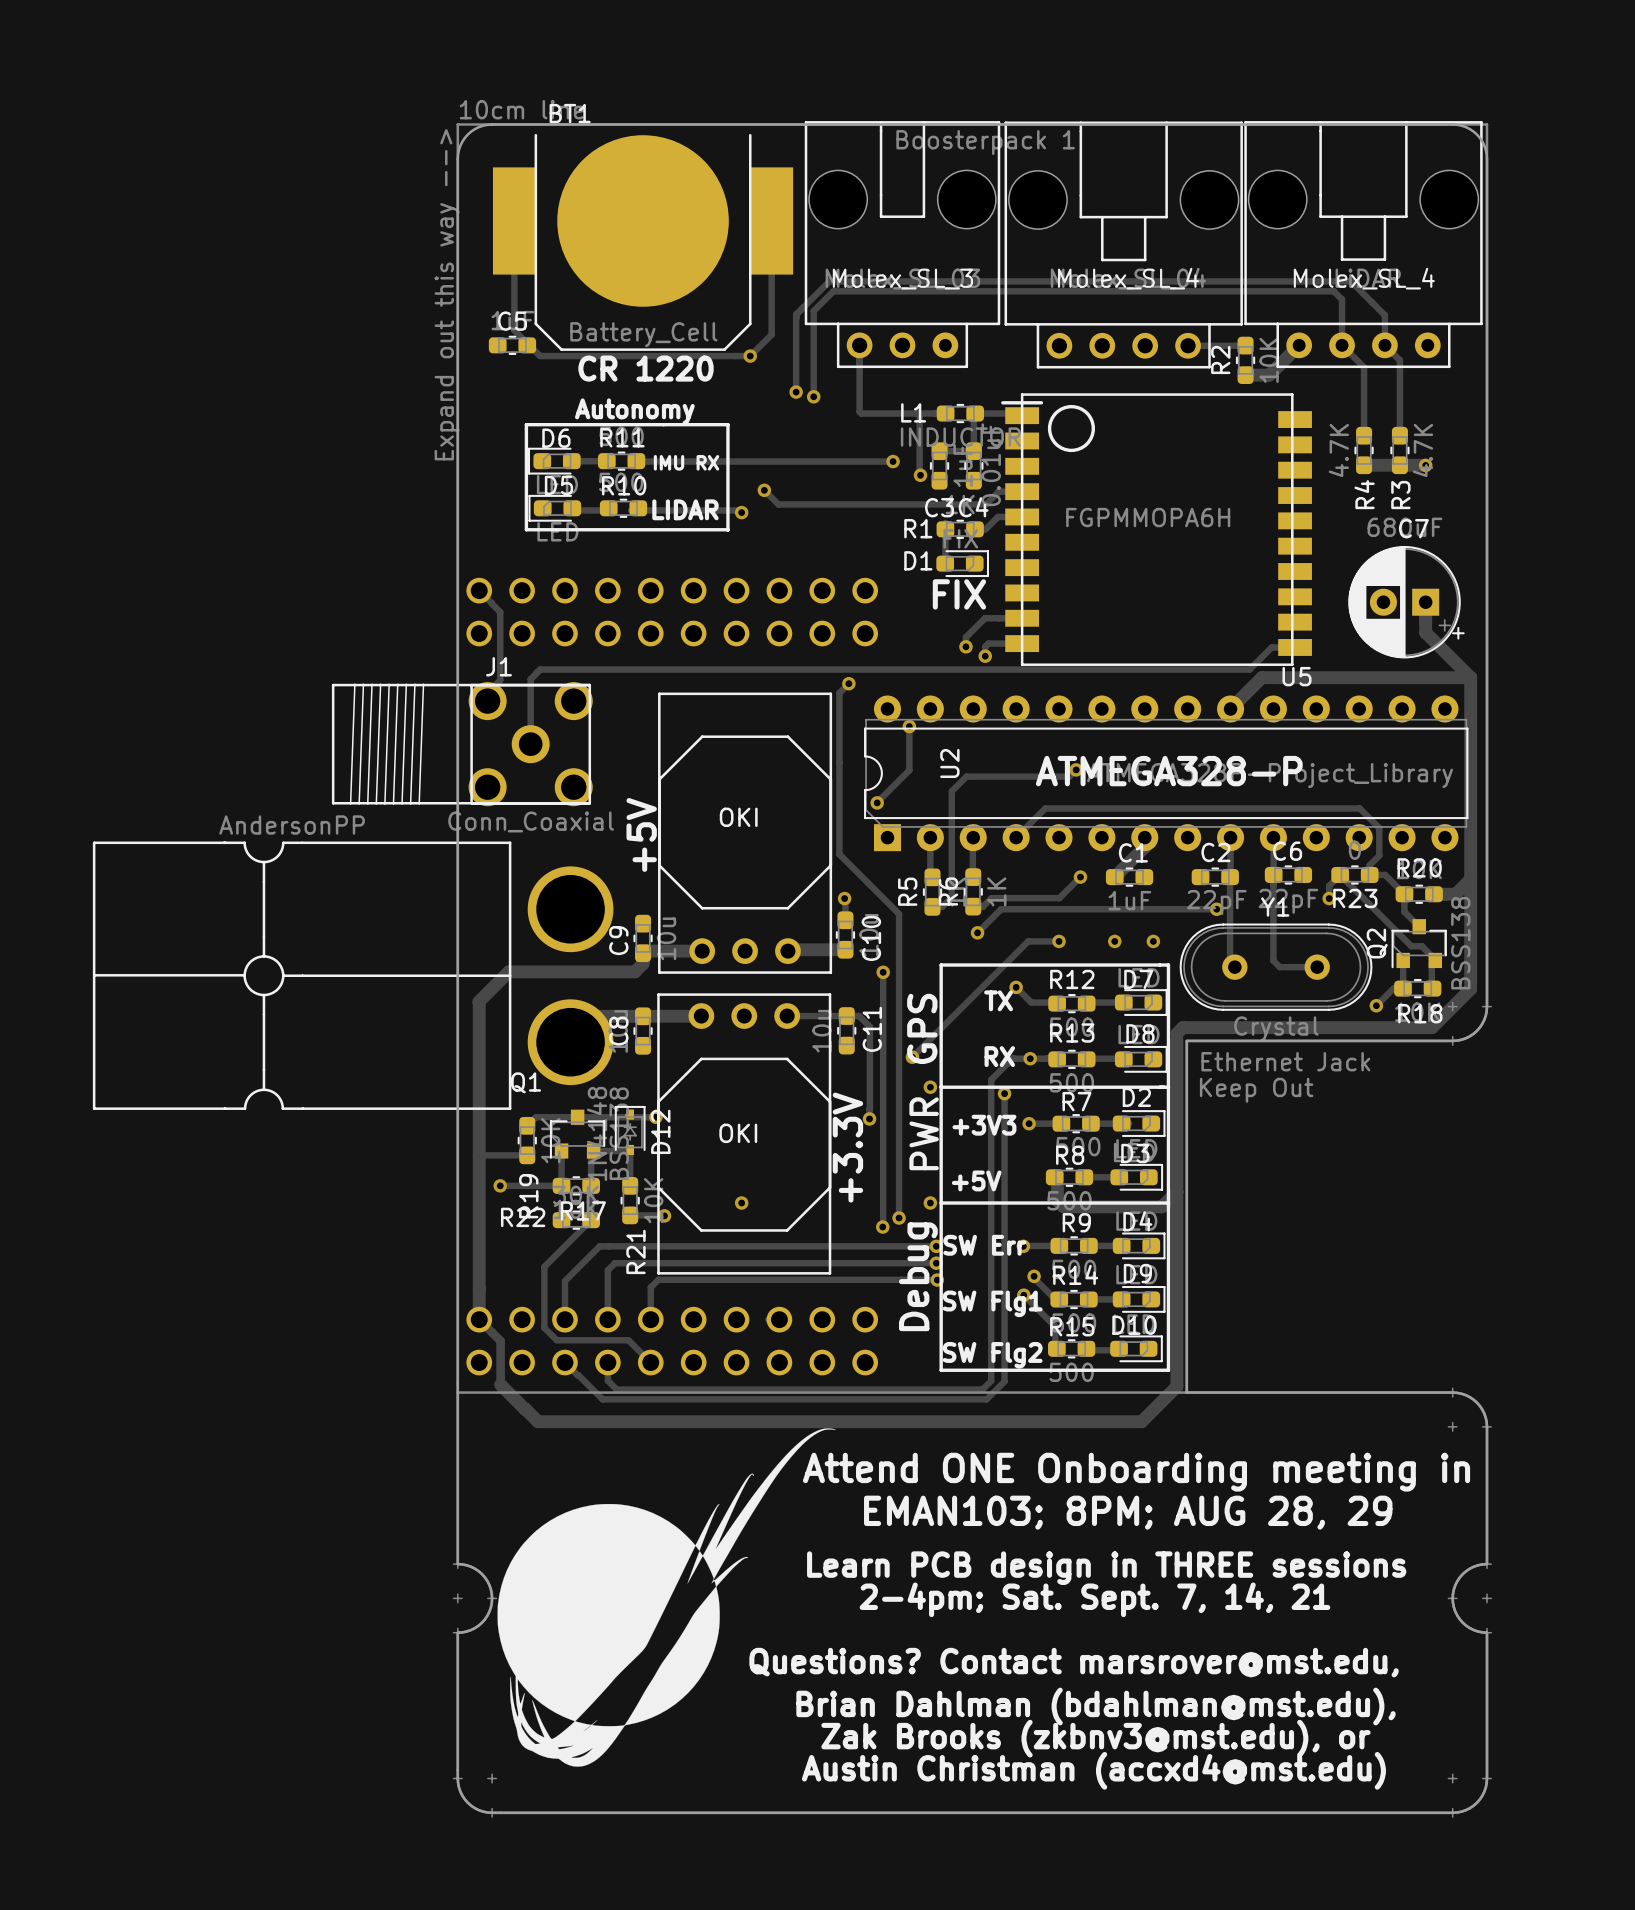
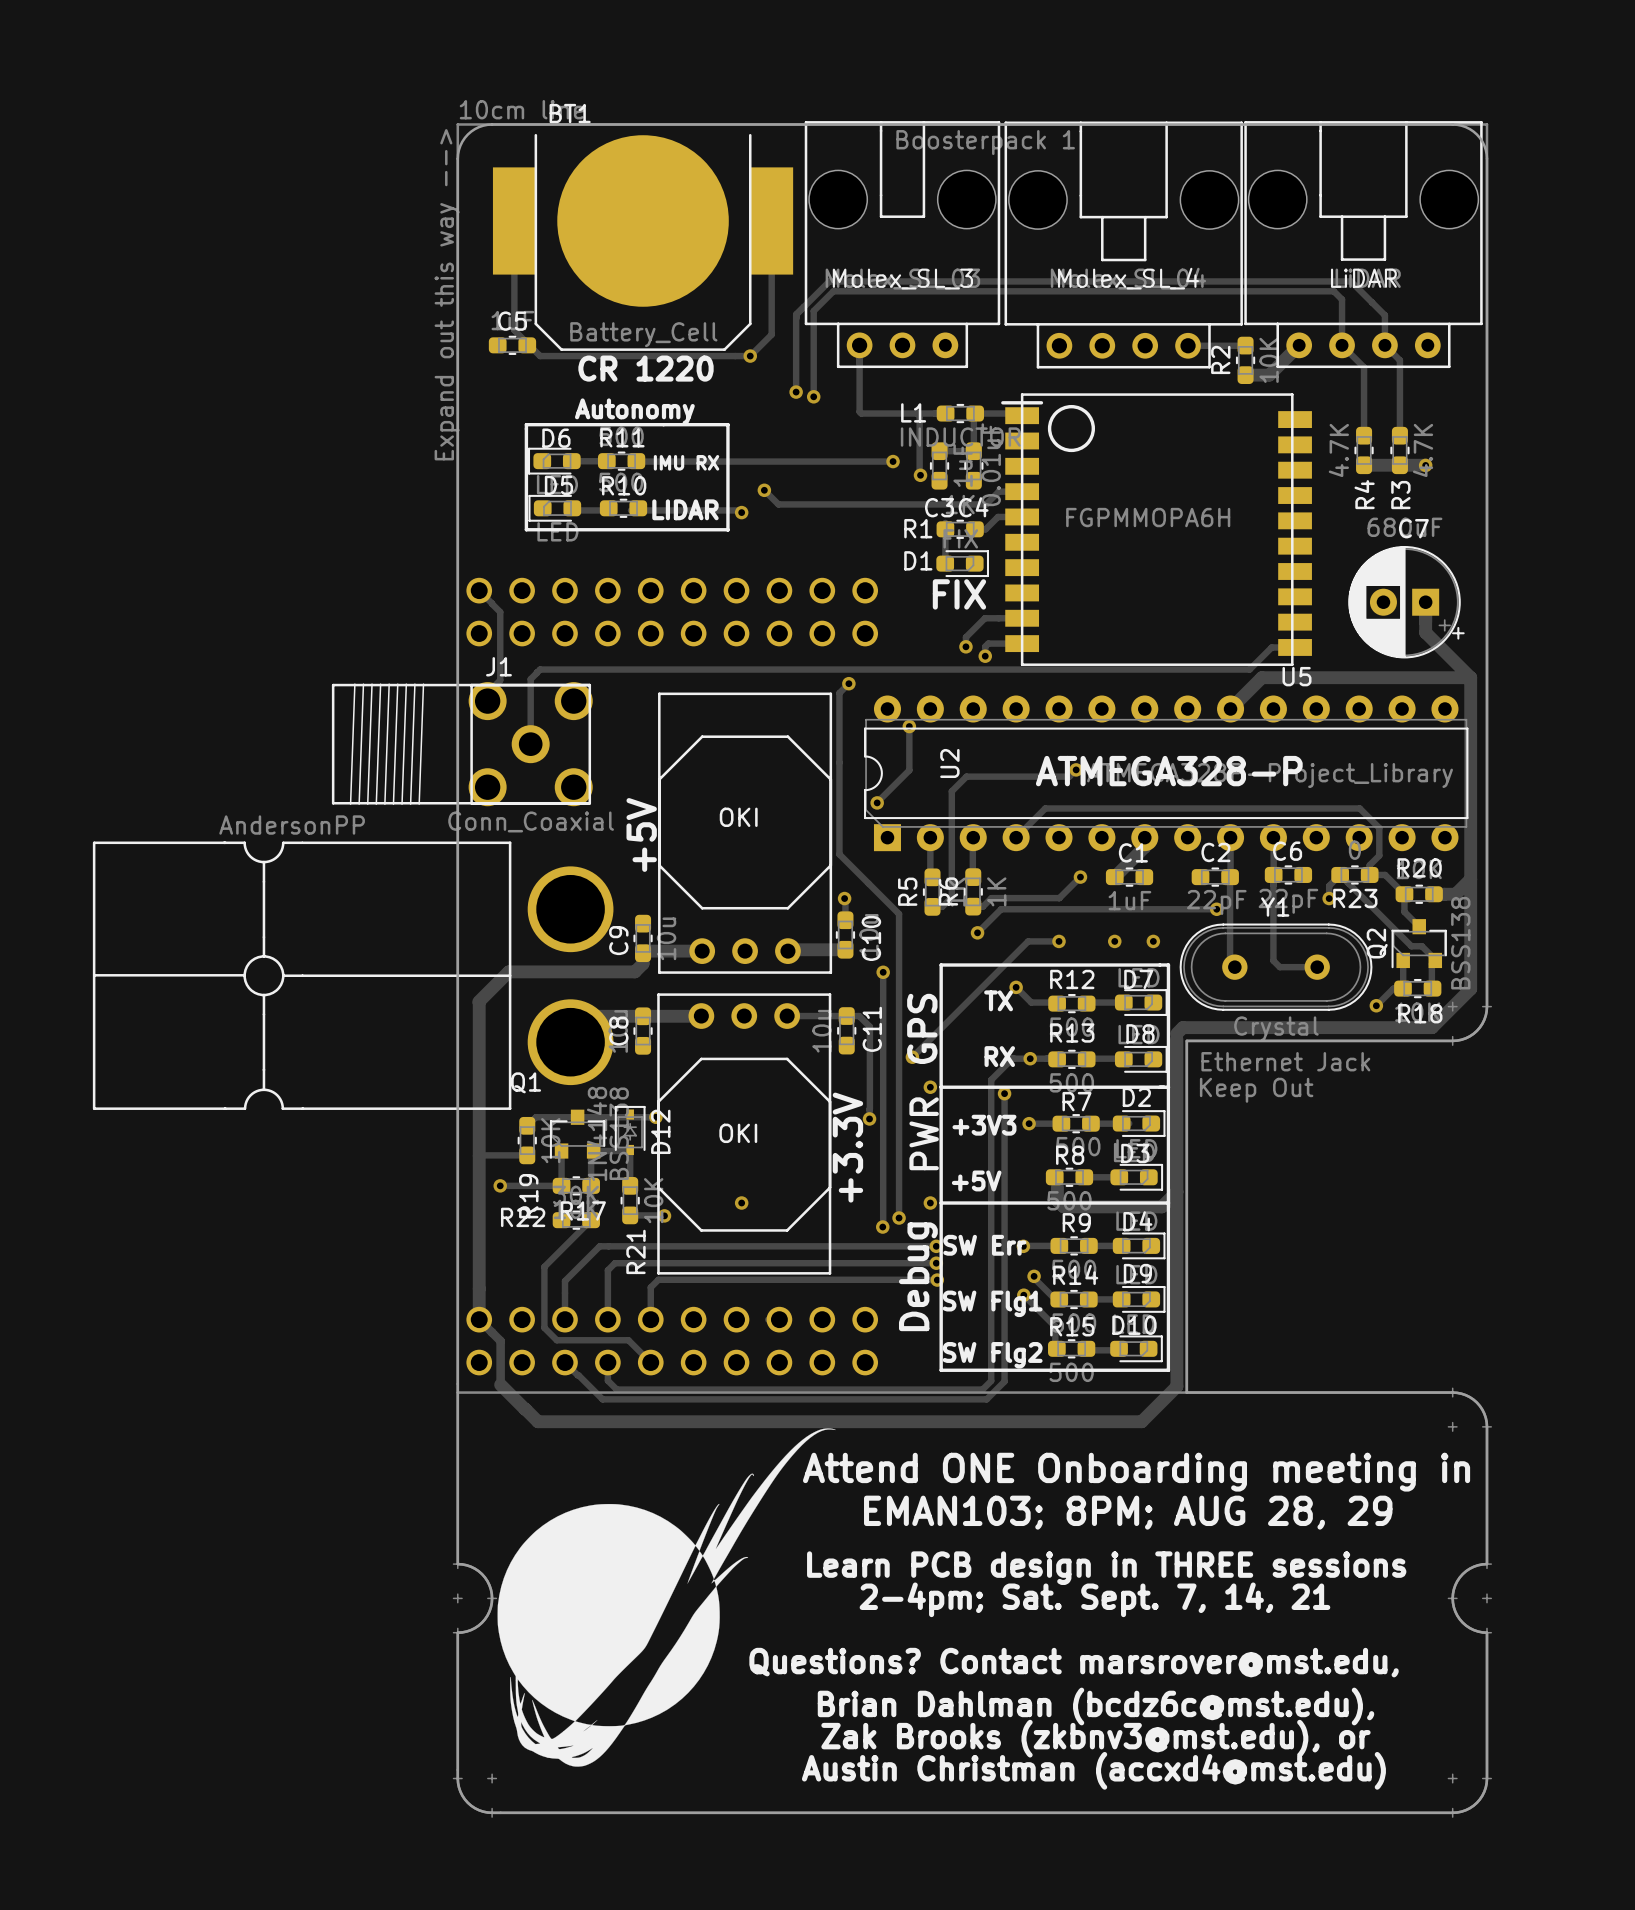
text: Molex_SL_4 (1364, 278) -> LiDAR (1363, 278)
text: Brian Dahlman (bdahlman@mst.edu), (1095, 1706) -> Brian Dahlman (bcdz6c@mst.edu), (1095, 1706)

